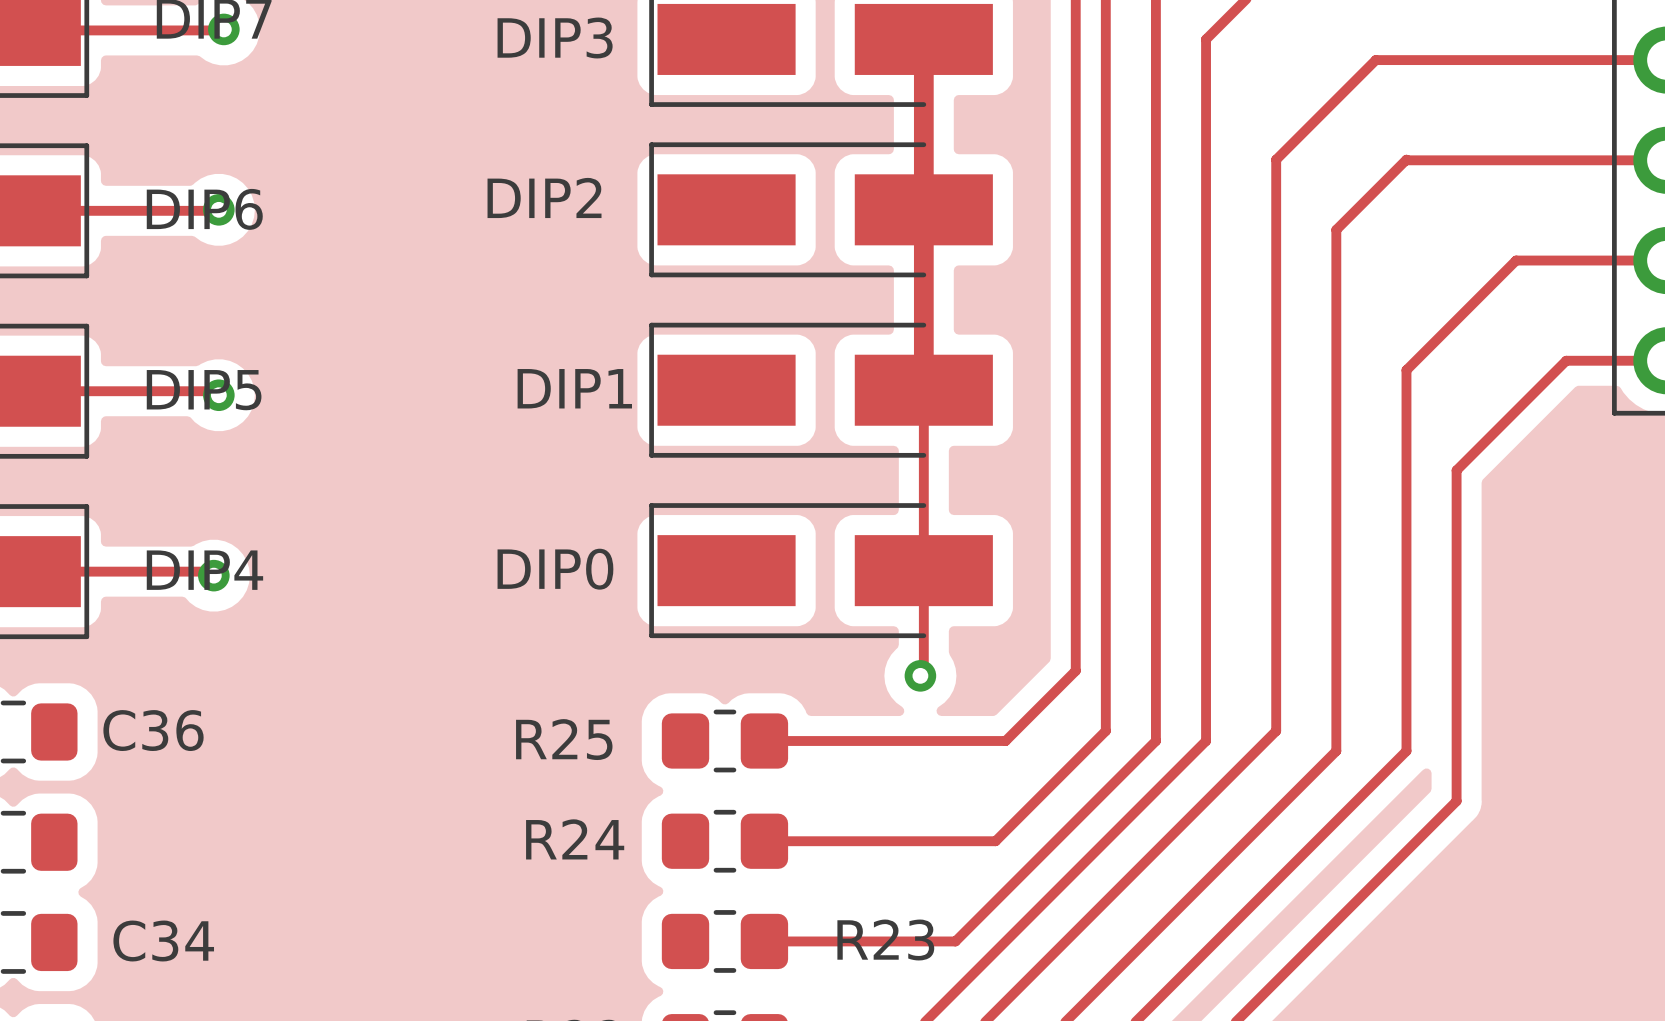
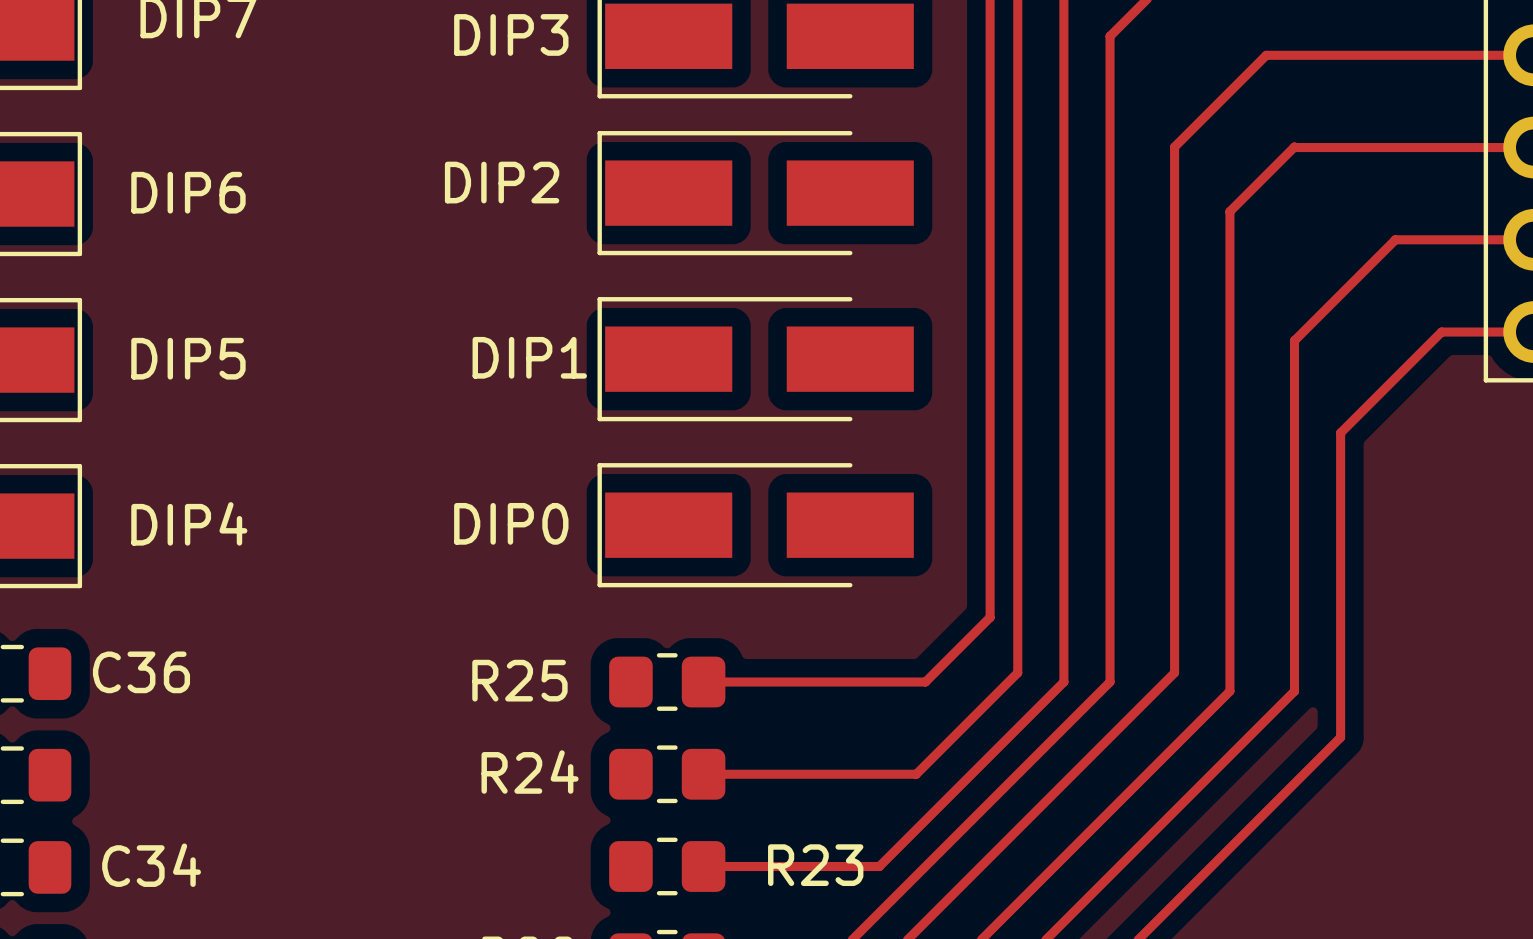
track: (223, 29) (11, 30) -> none
via: (223, 29) -> none
track: (923, 39) (923, 672) (920, 675) -> none
track: (218, 209) (11, 210) -> none
via: (218, 209) -> none
track: (11, 391) (214, 391) (218, 395) -> none
via: (218, 395) -> none
track: (11, 571) (209, 571) (213, 575) -> none
via: (213, 575) -> none
via: (920, 675) -> none

